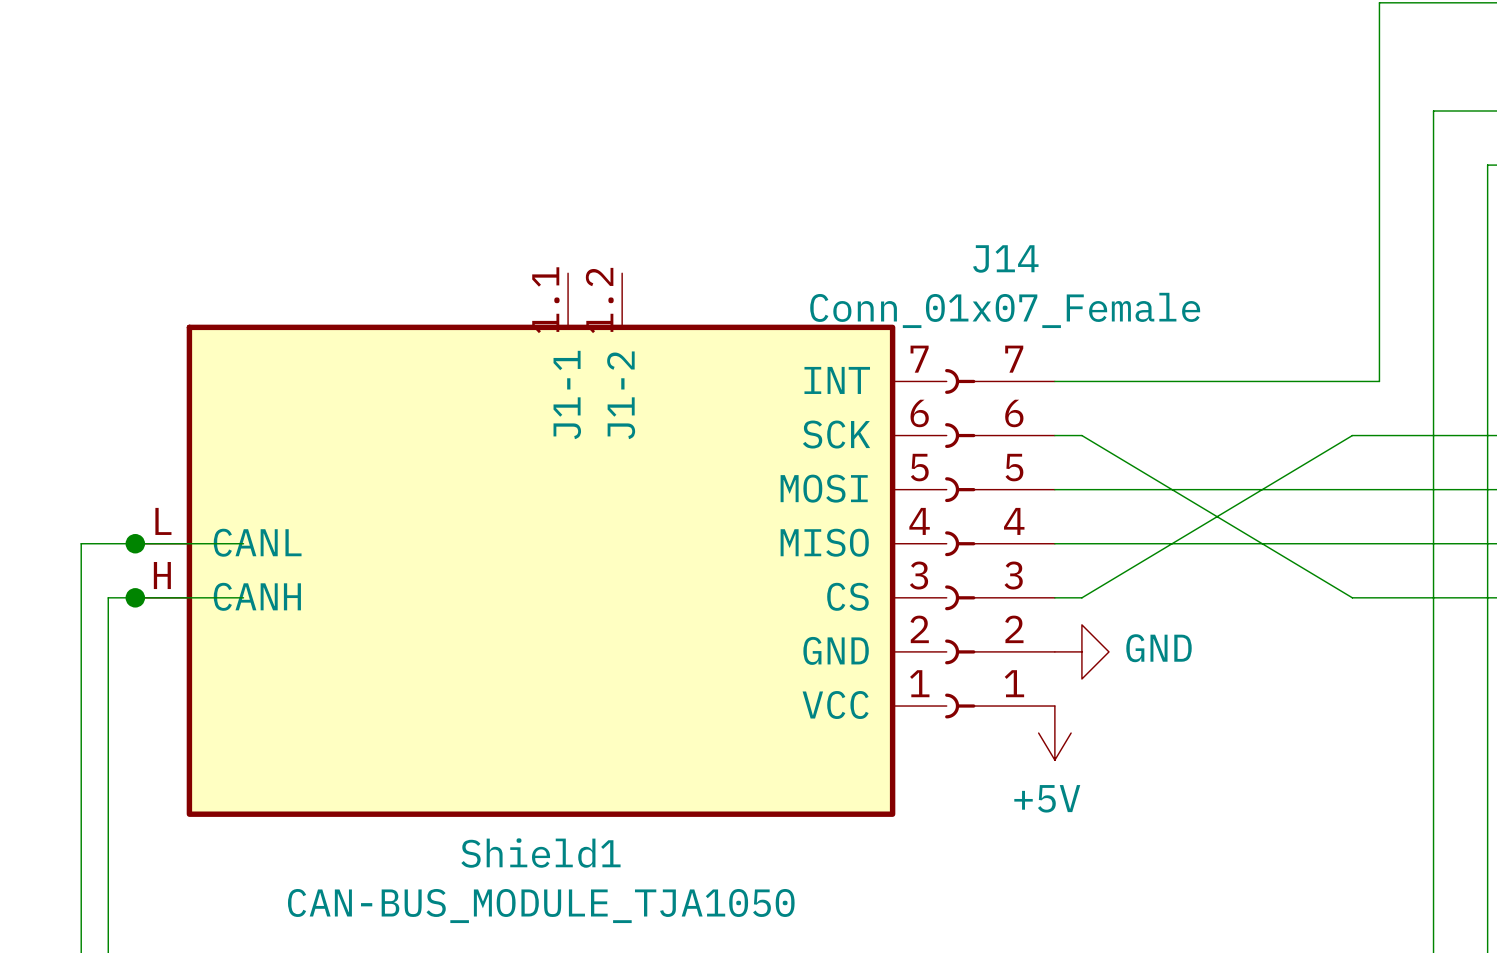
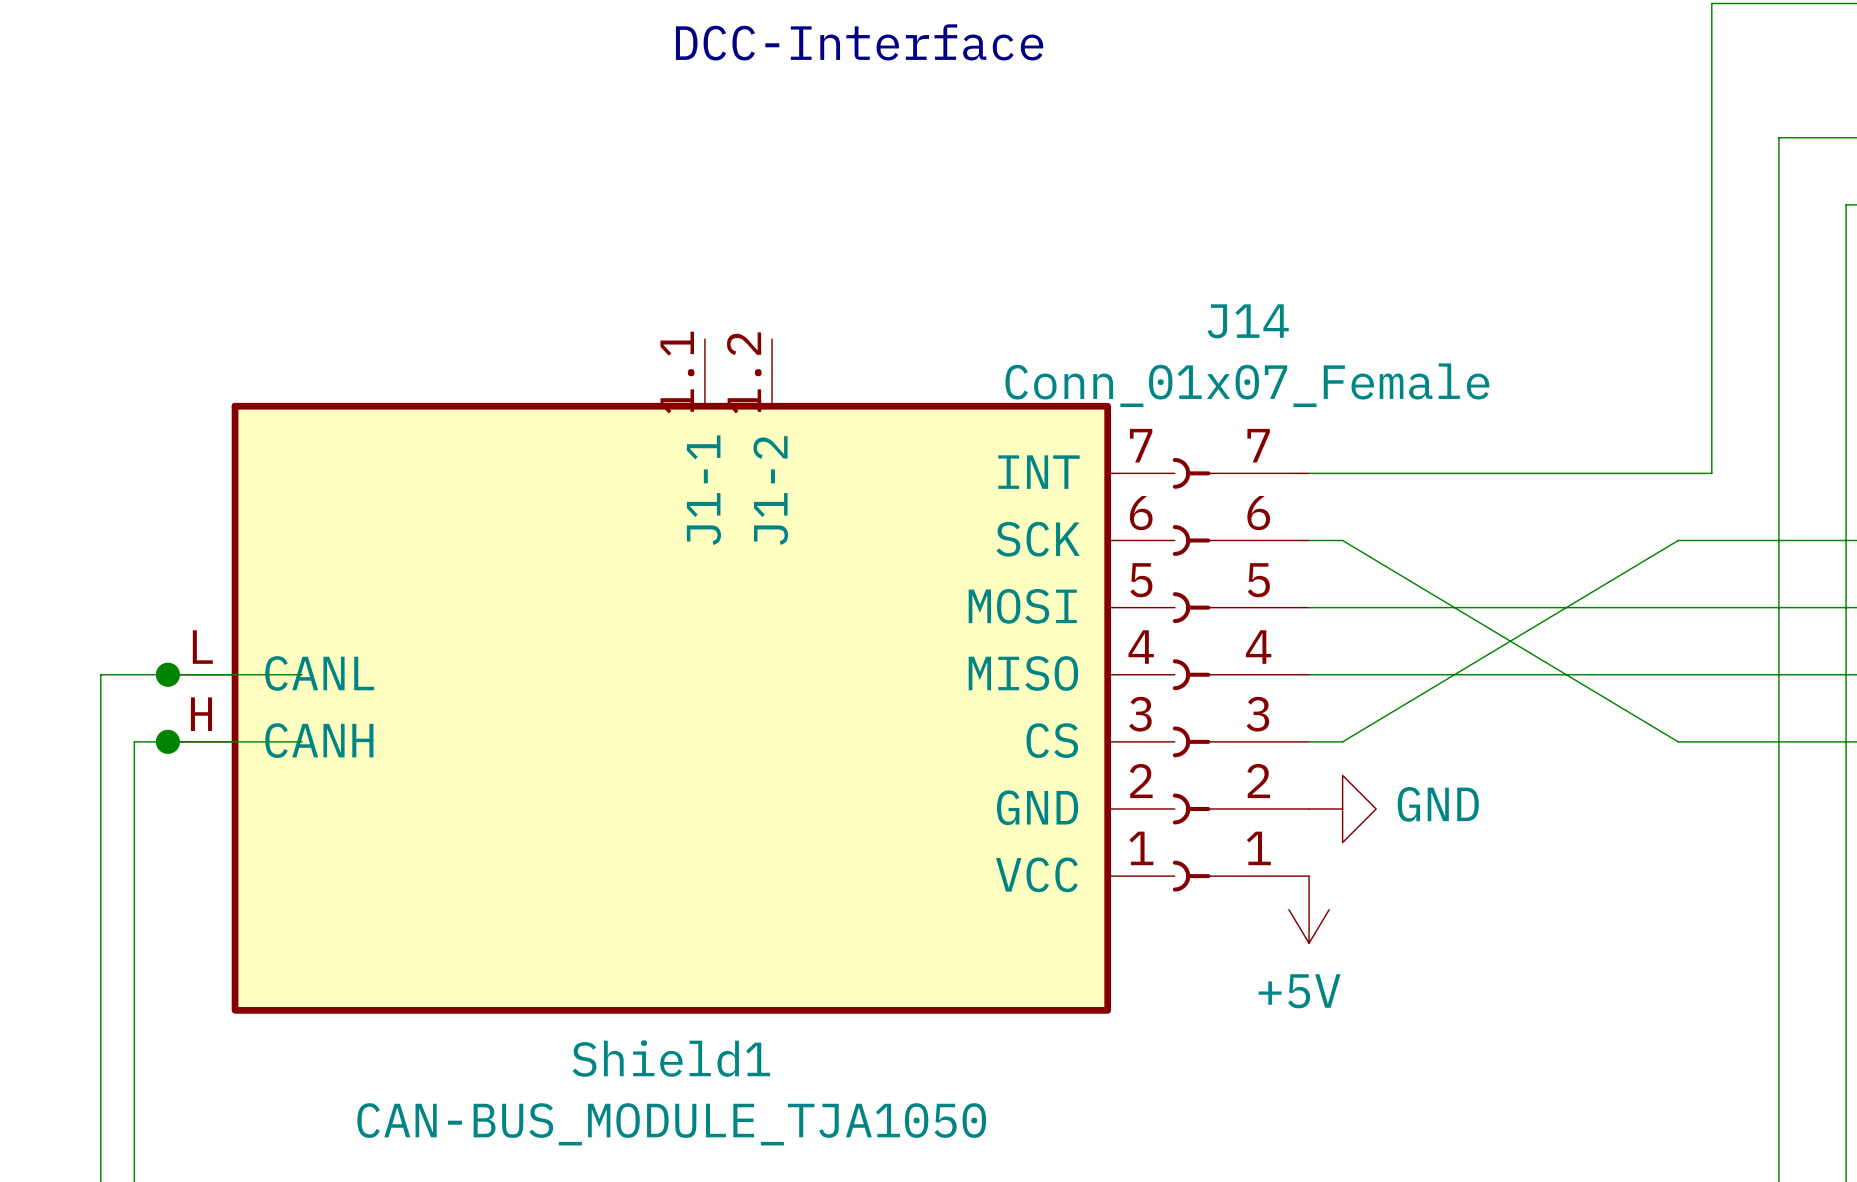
text: none -> DCC-Interface (859, 42)

